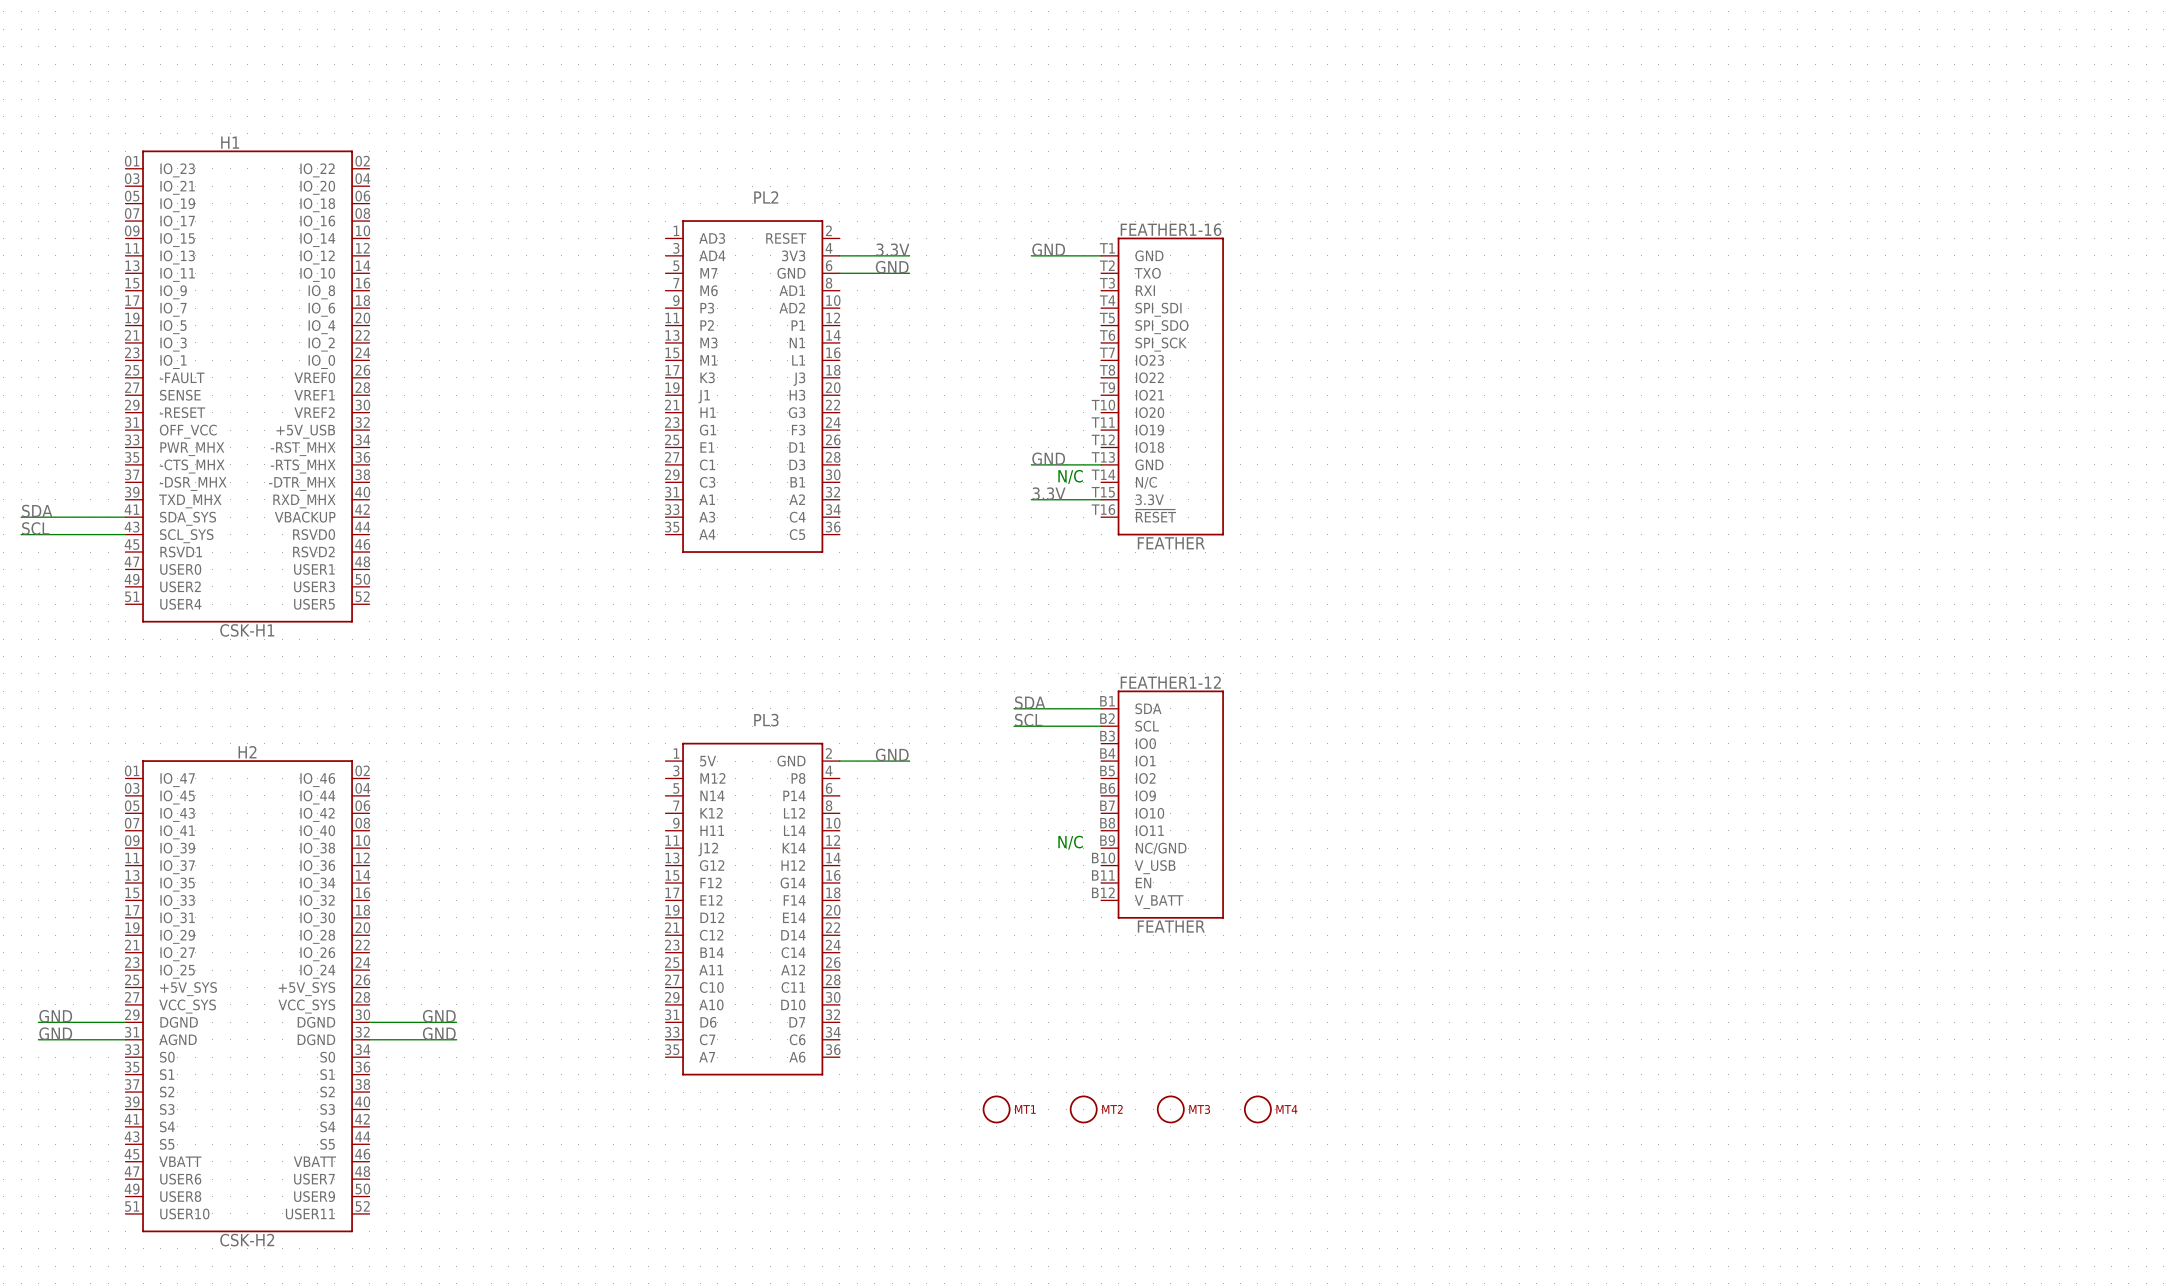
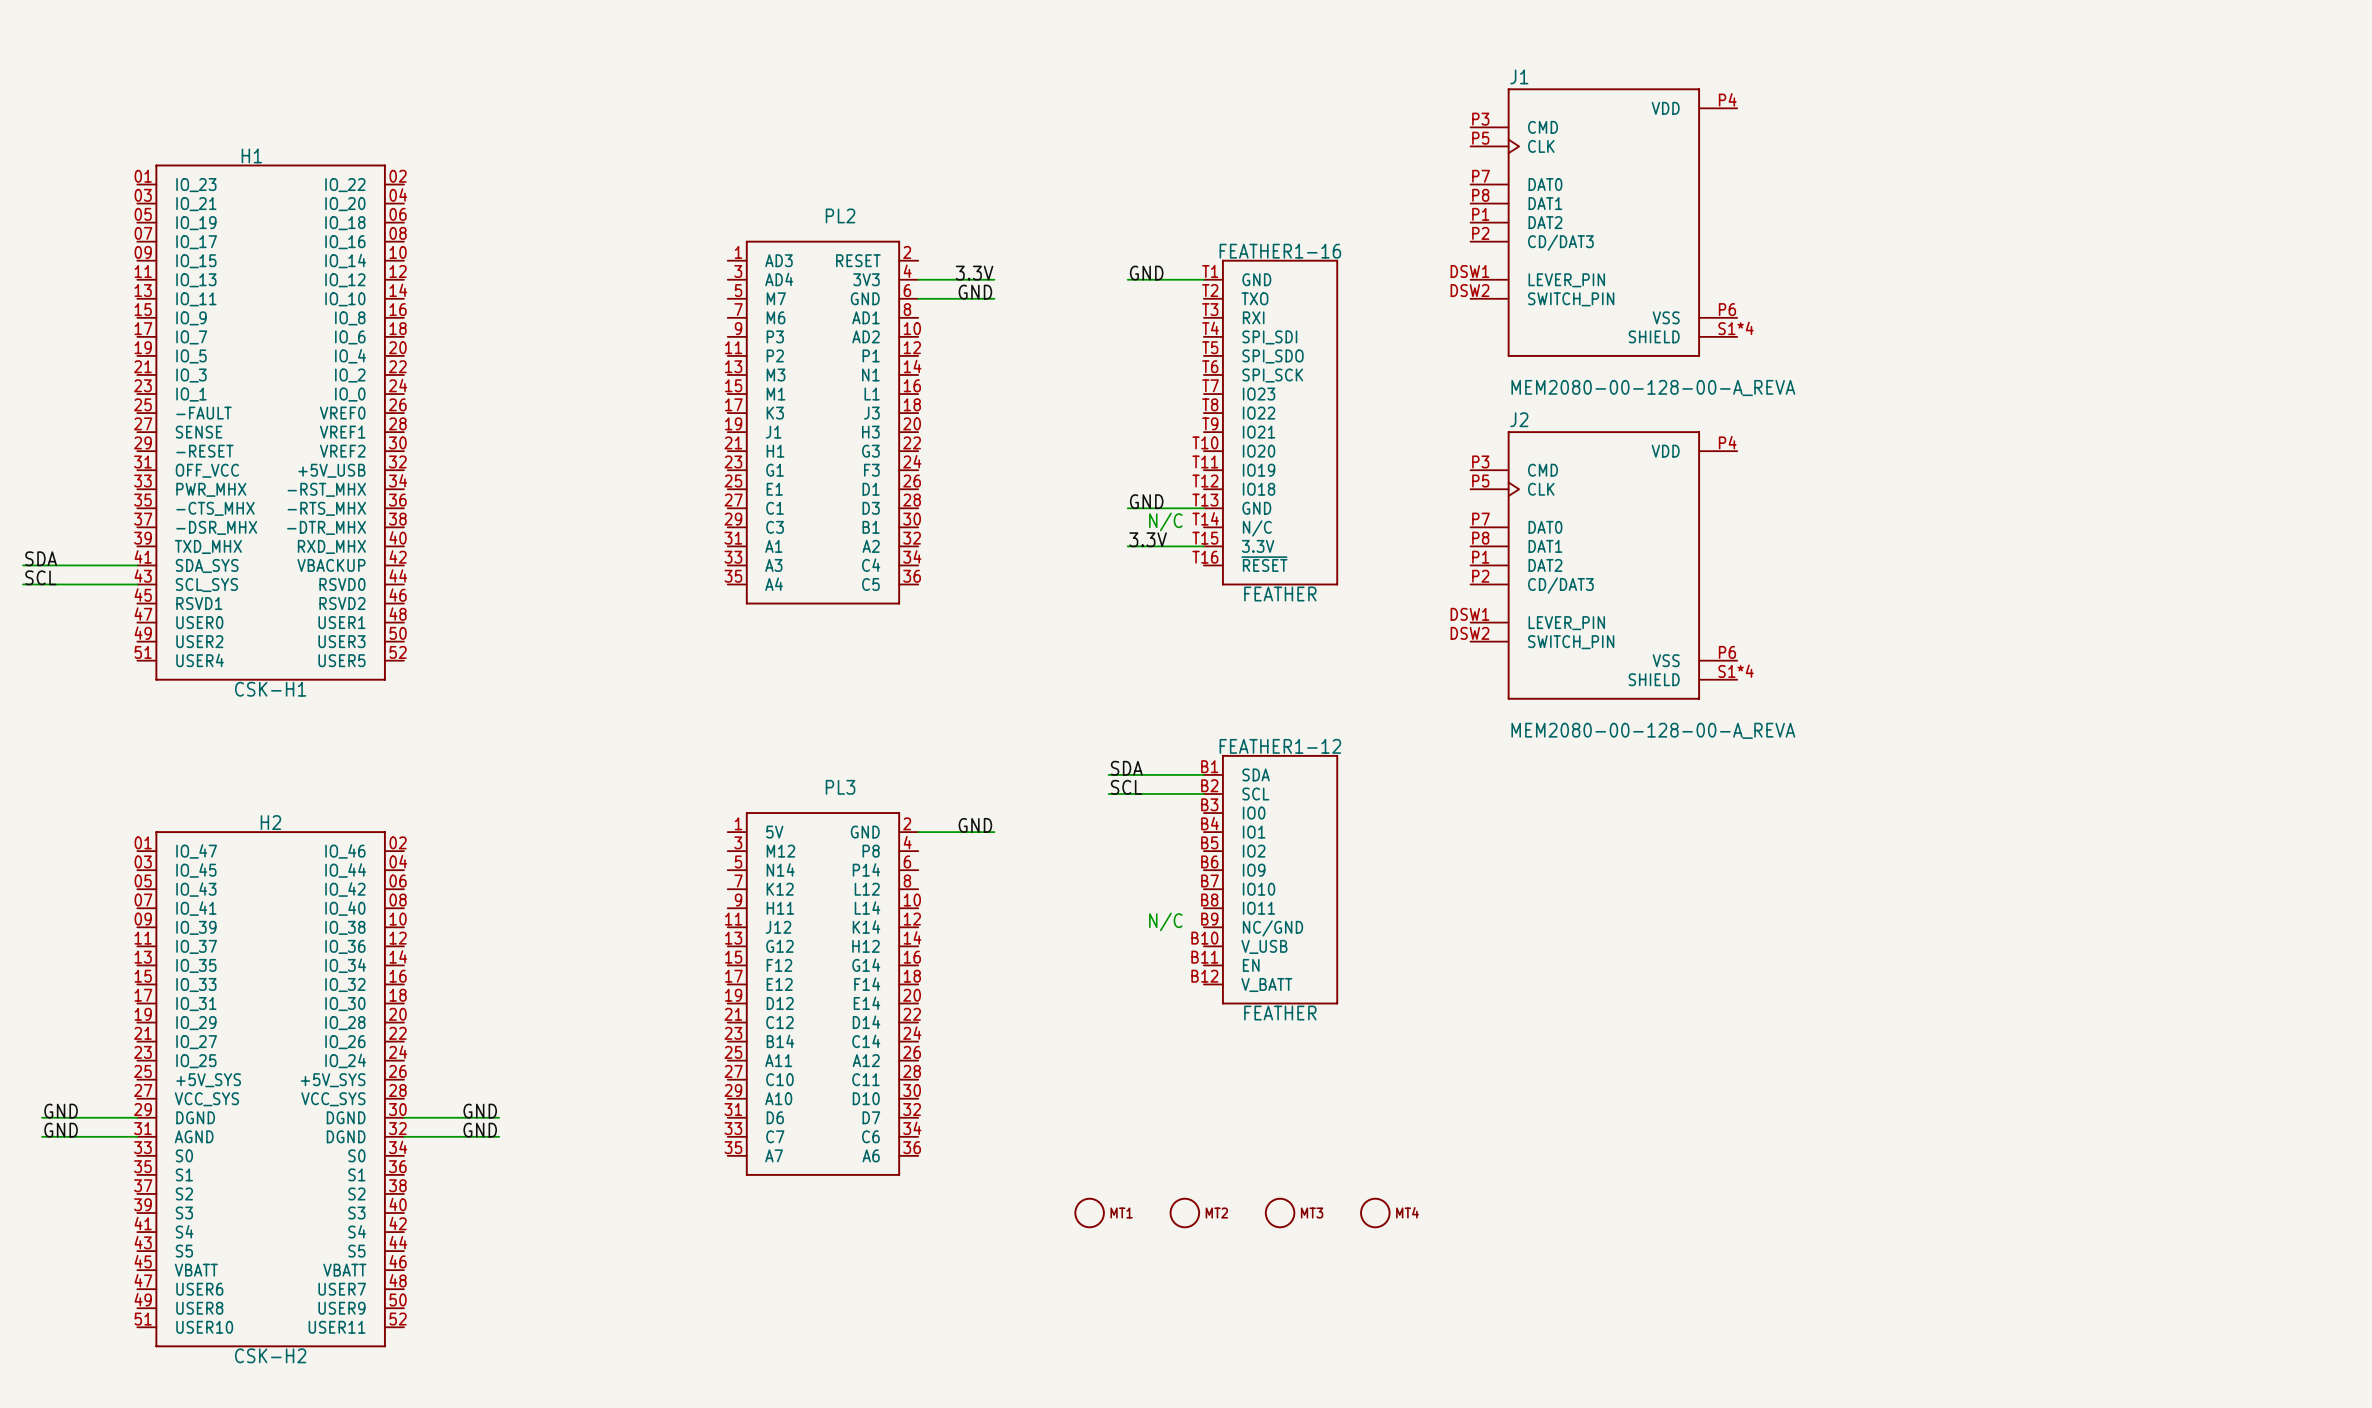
J1: none -> MEM2080-00-128-00-A_REVA (1603, 222)
J2: none -> MEM2080-00-128-00-A_REVA (1603, 565)

